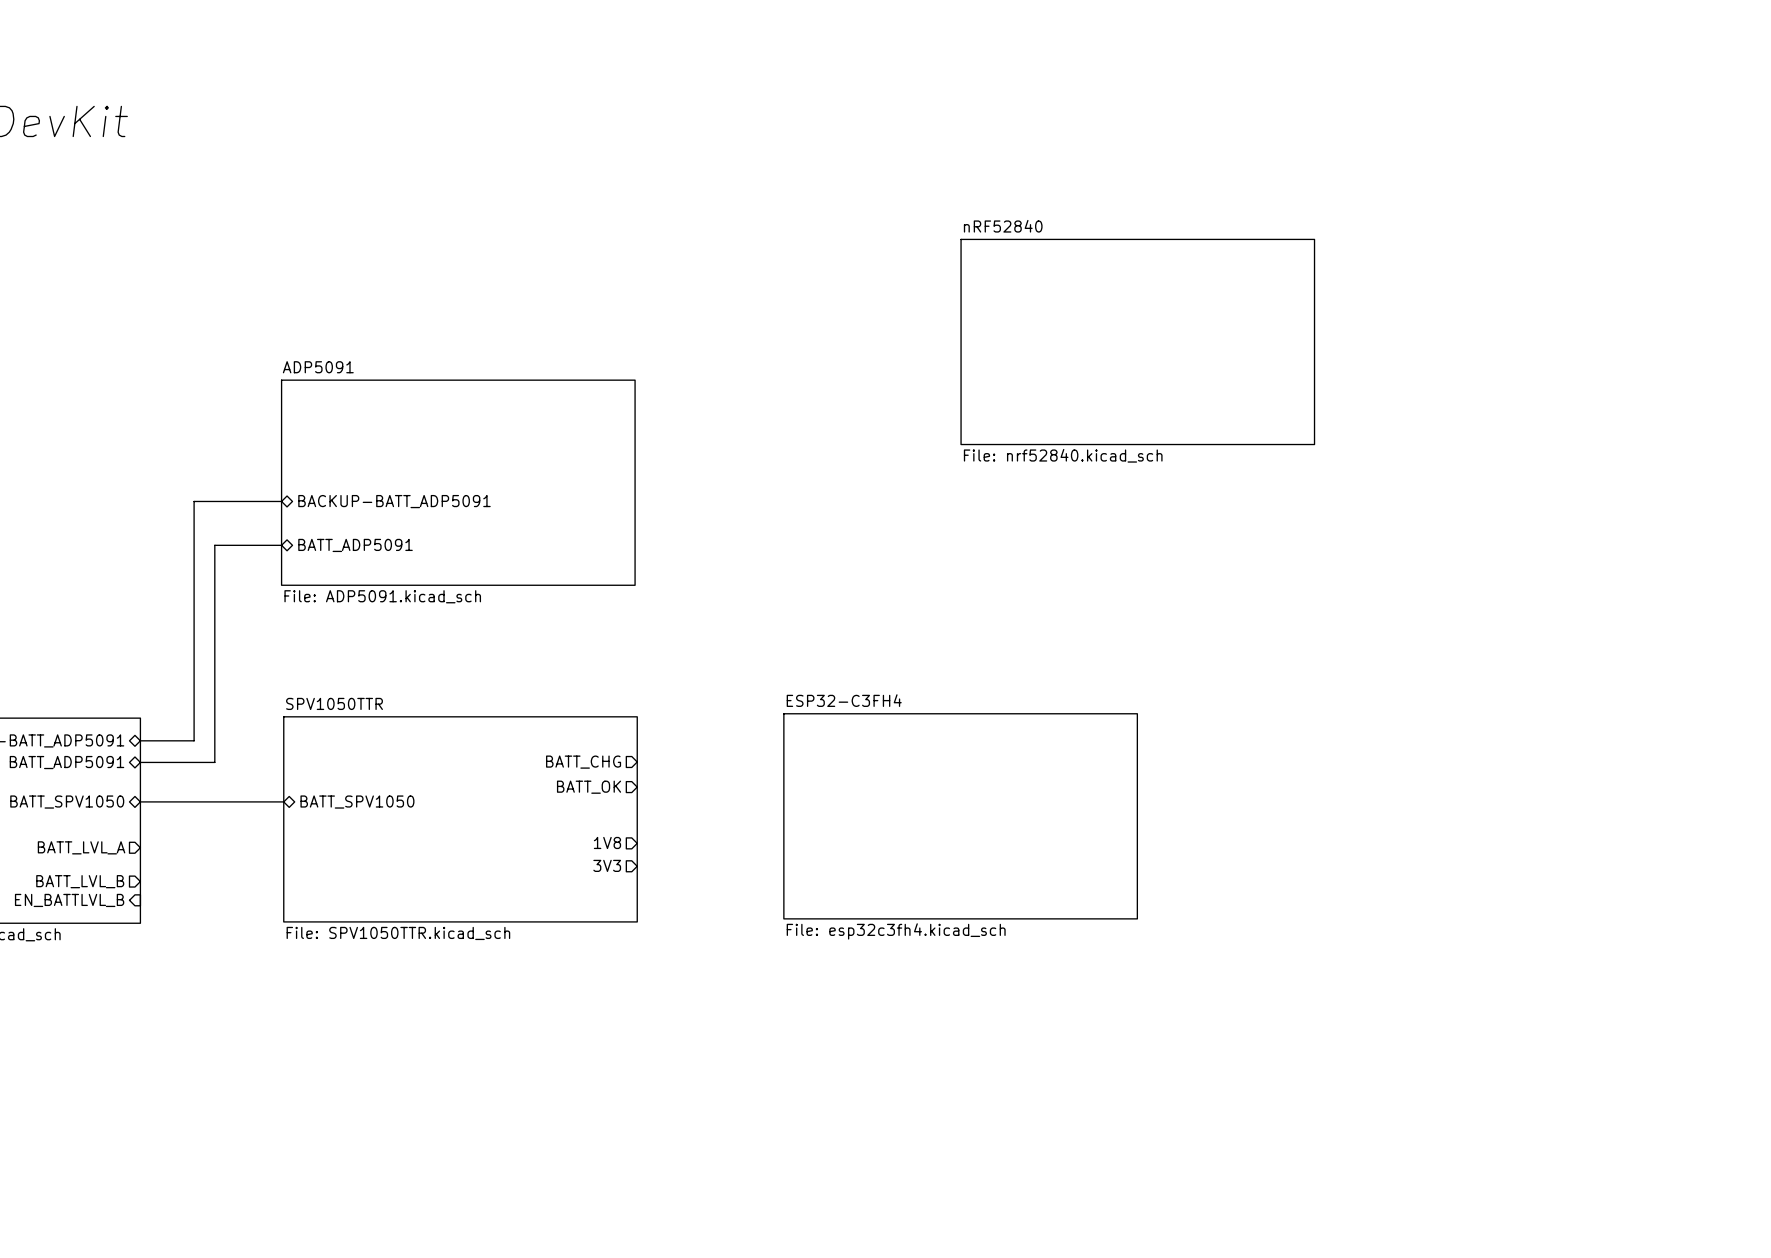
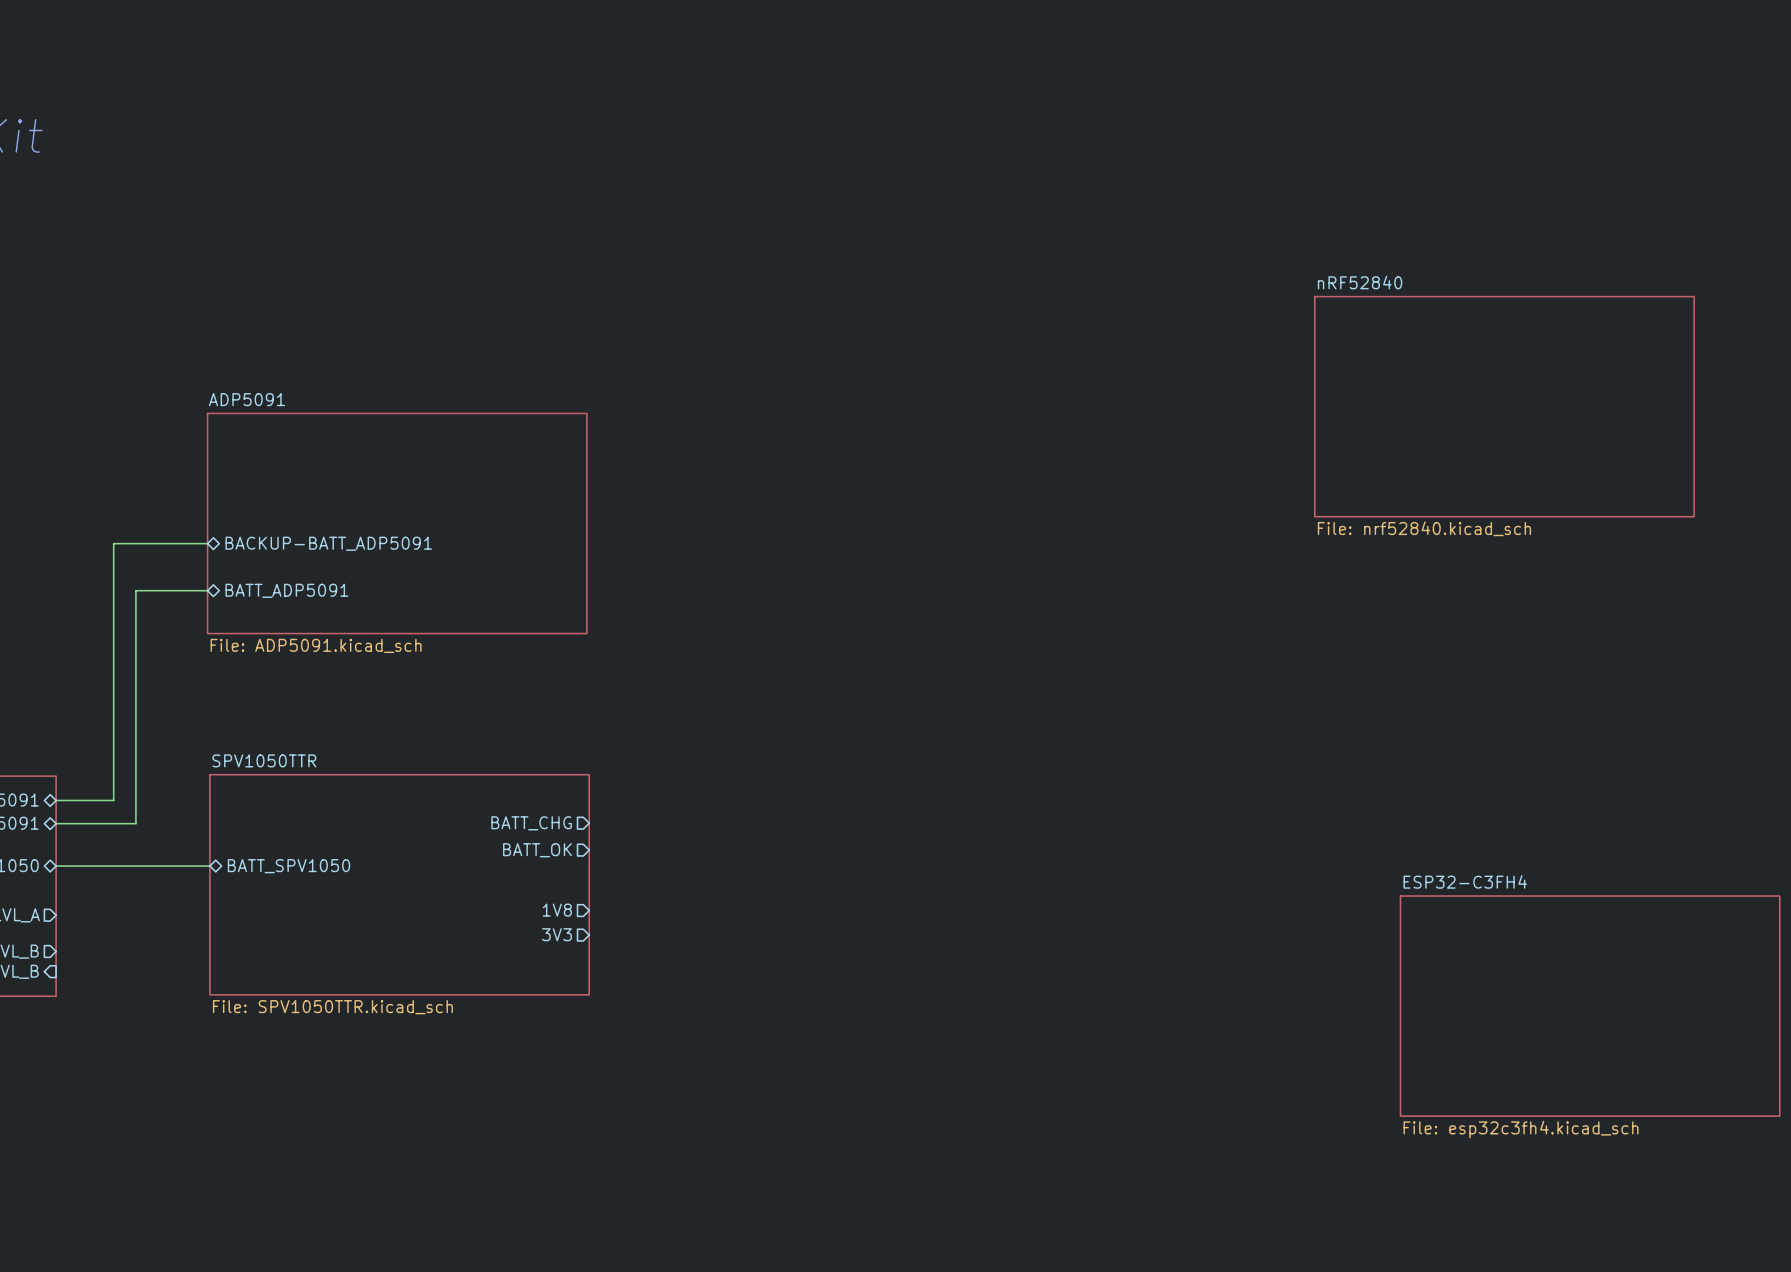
sheet nRF52840 position: (1137, 341) -> (1504, 406)
sheet ESP32-C3FH4 position: (960, 816) -> (1590, 1006)

